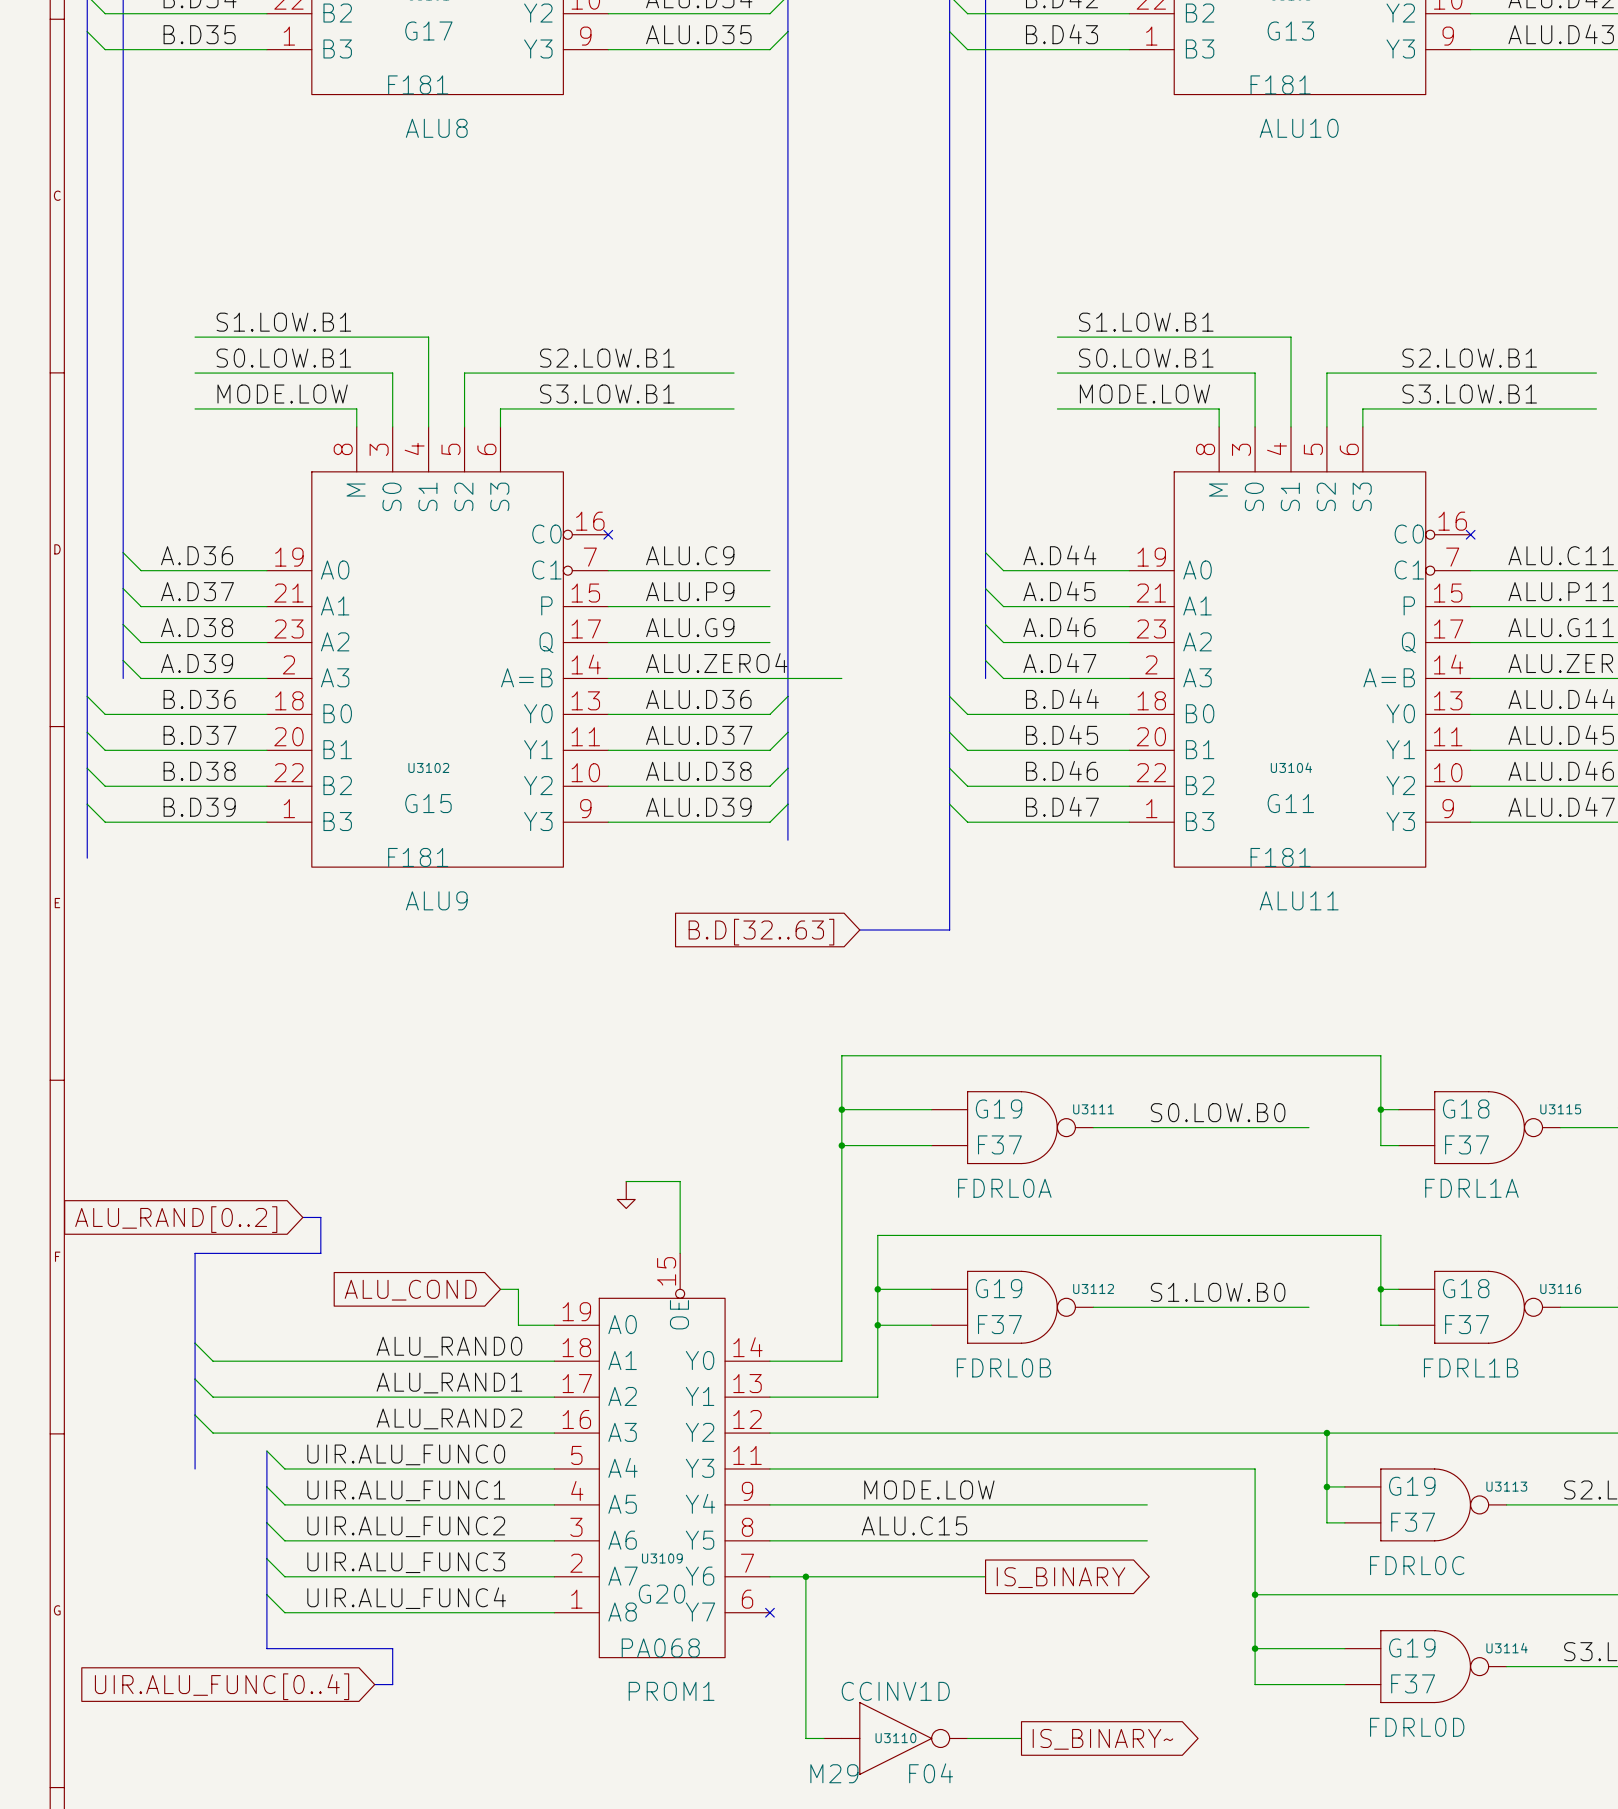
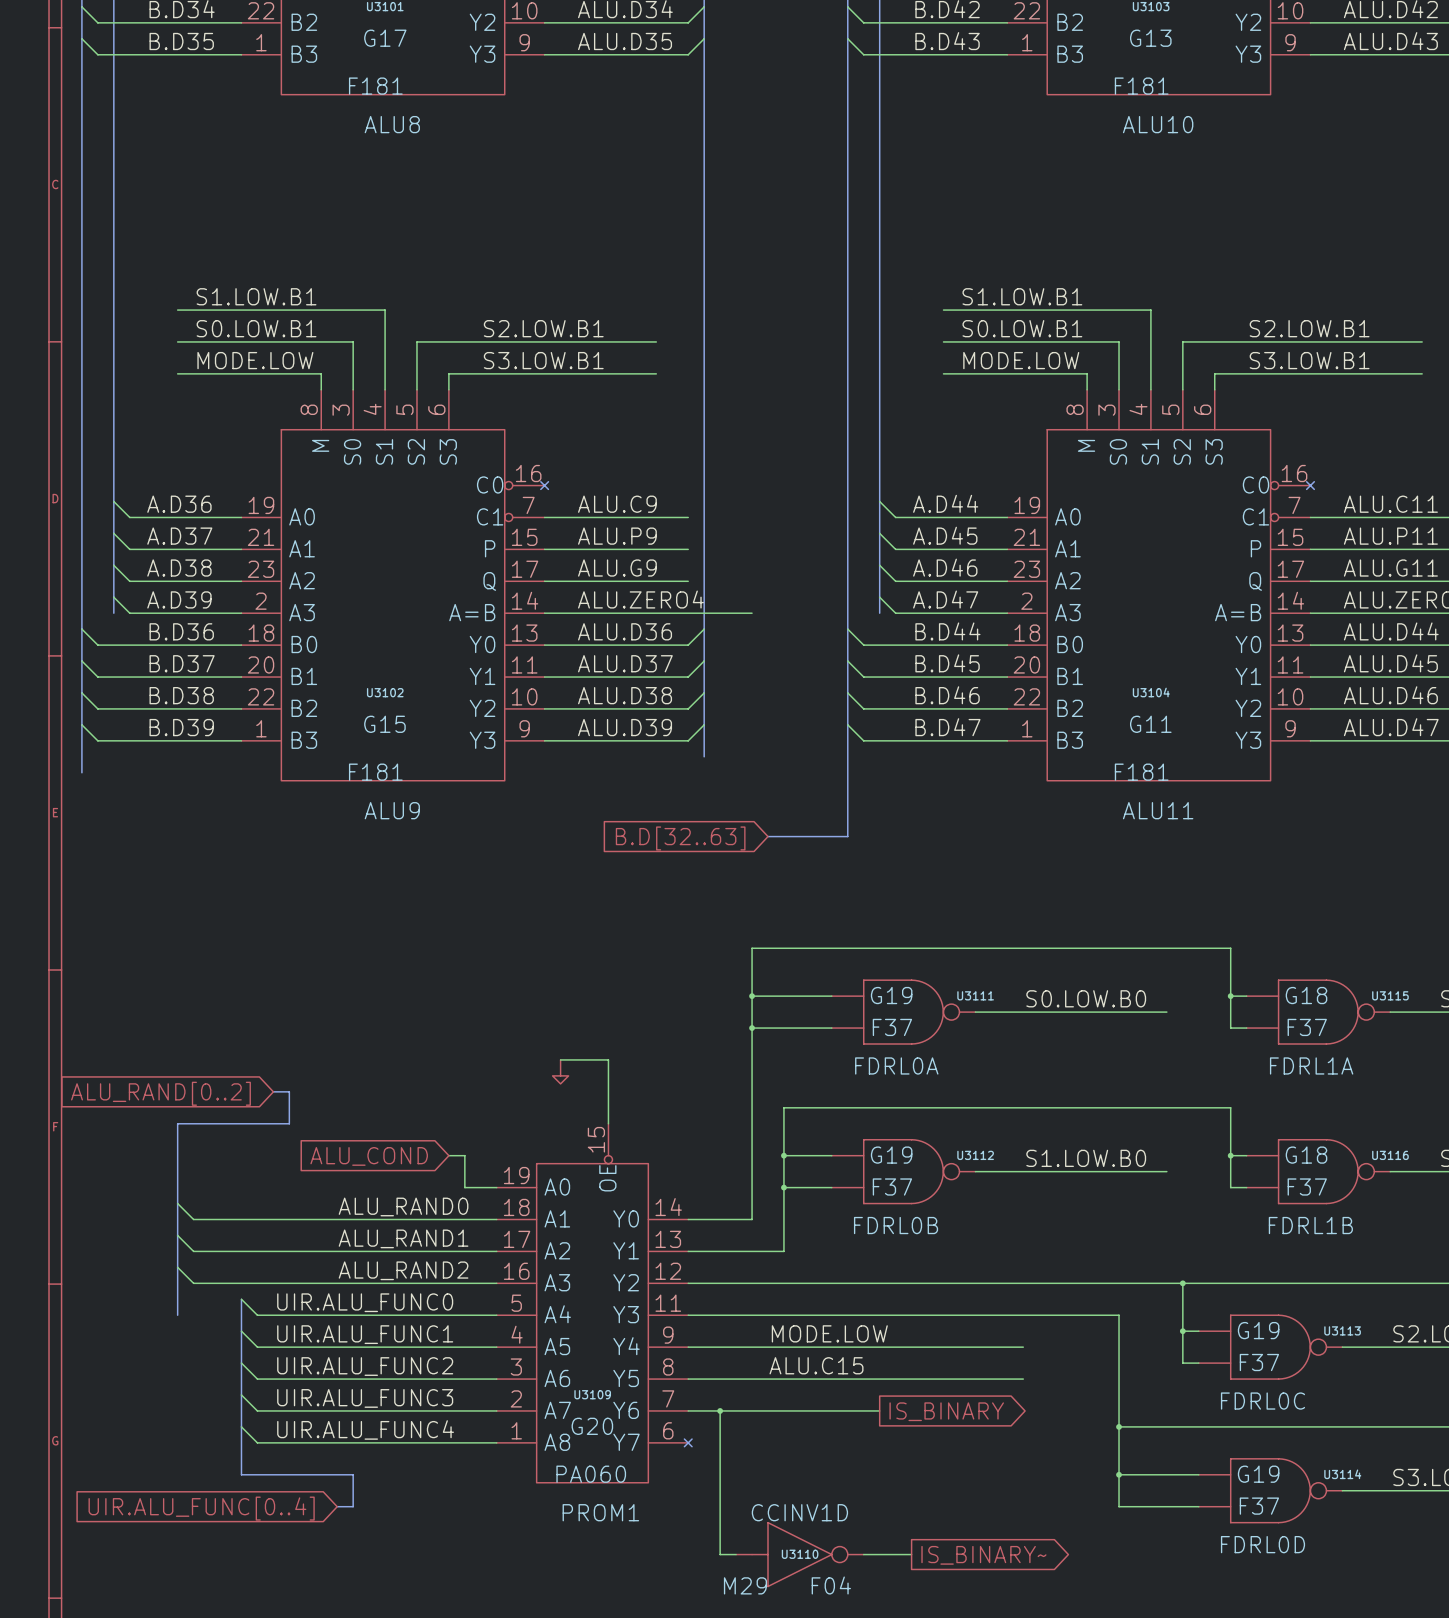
U3109 value: PA068 (660, 1647) -> PA060 (591, 1474)

